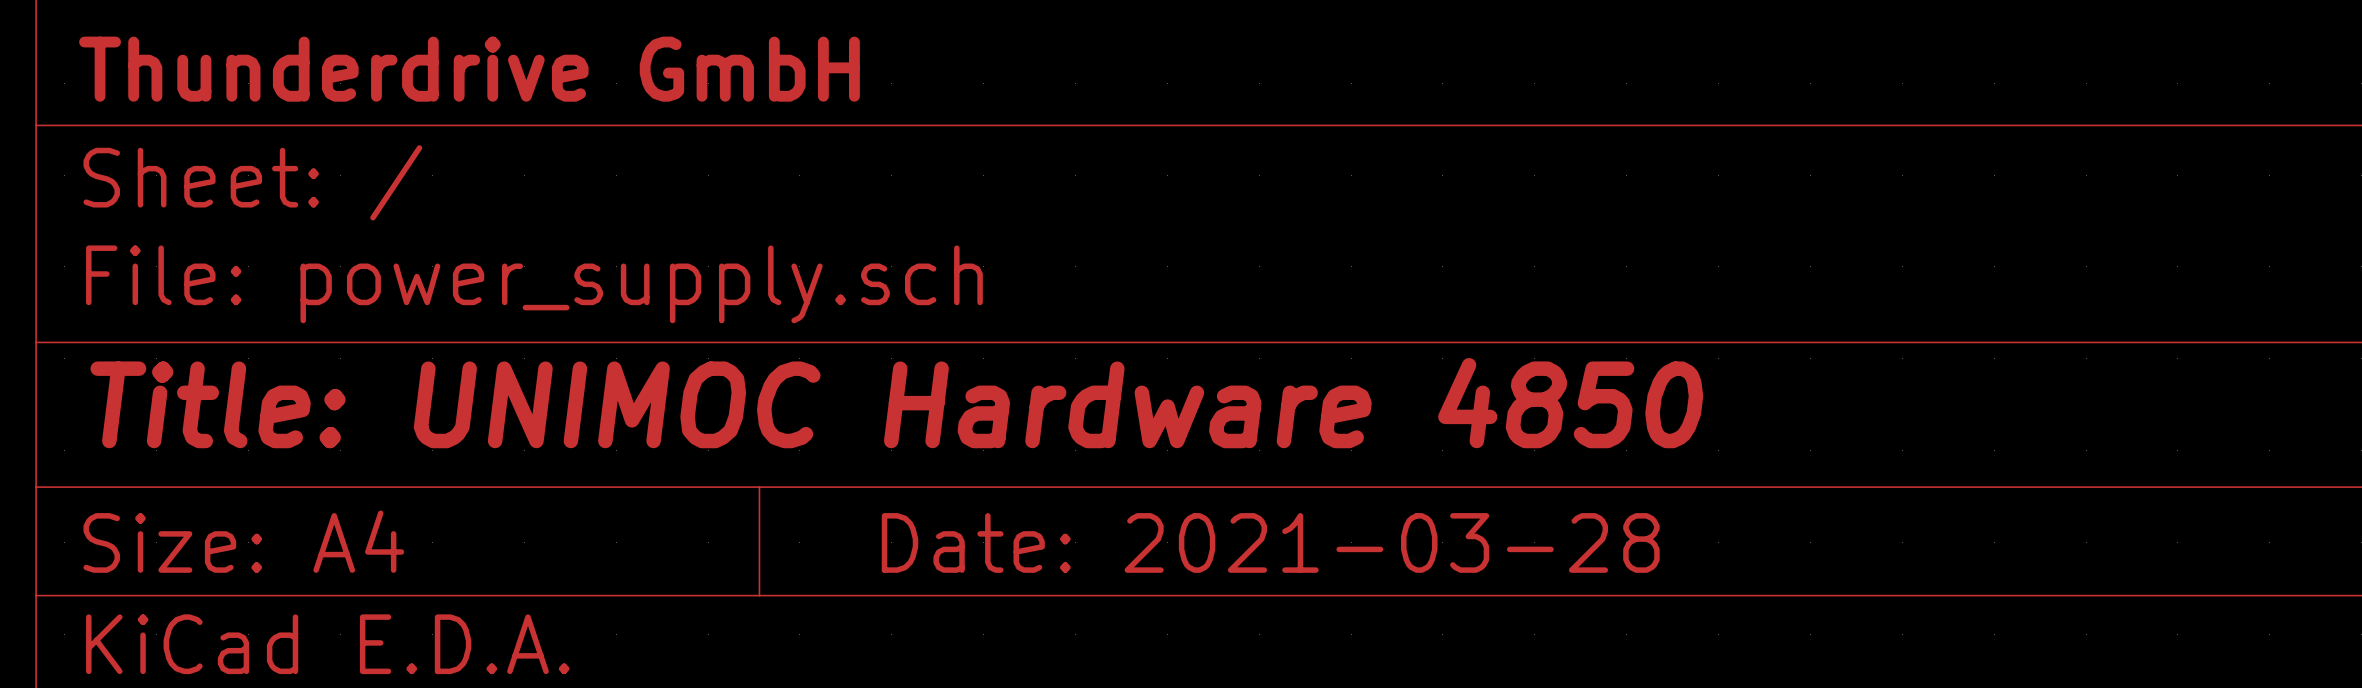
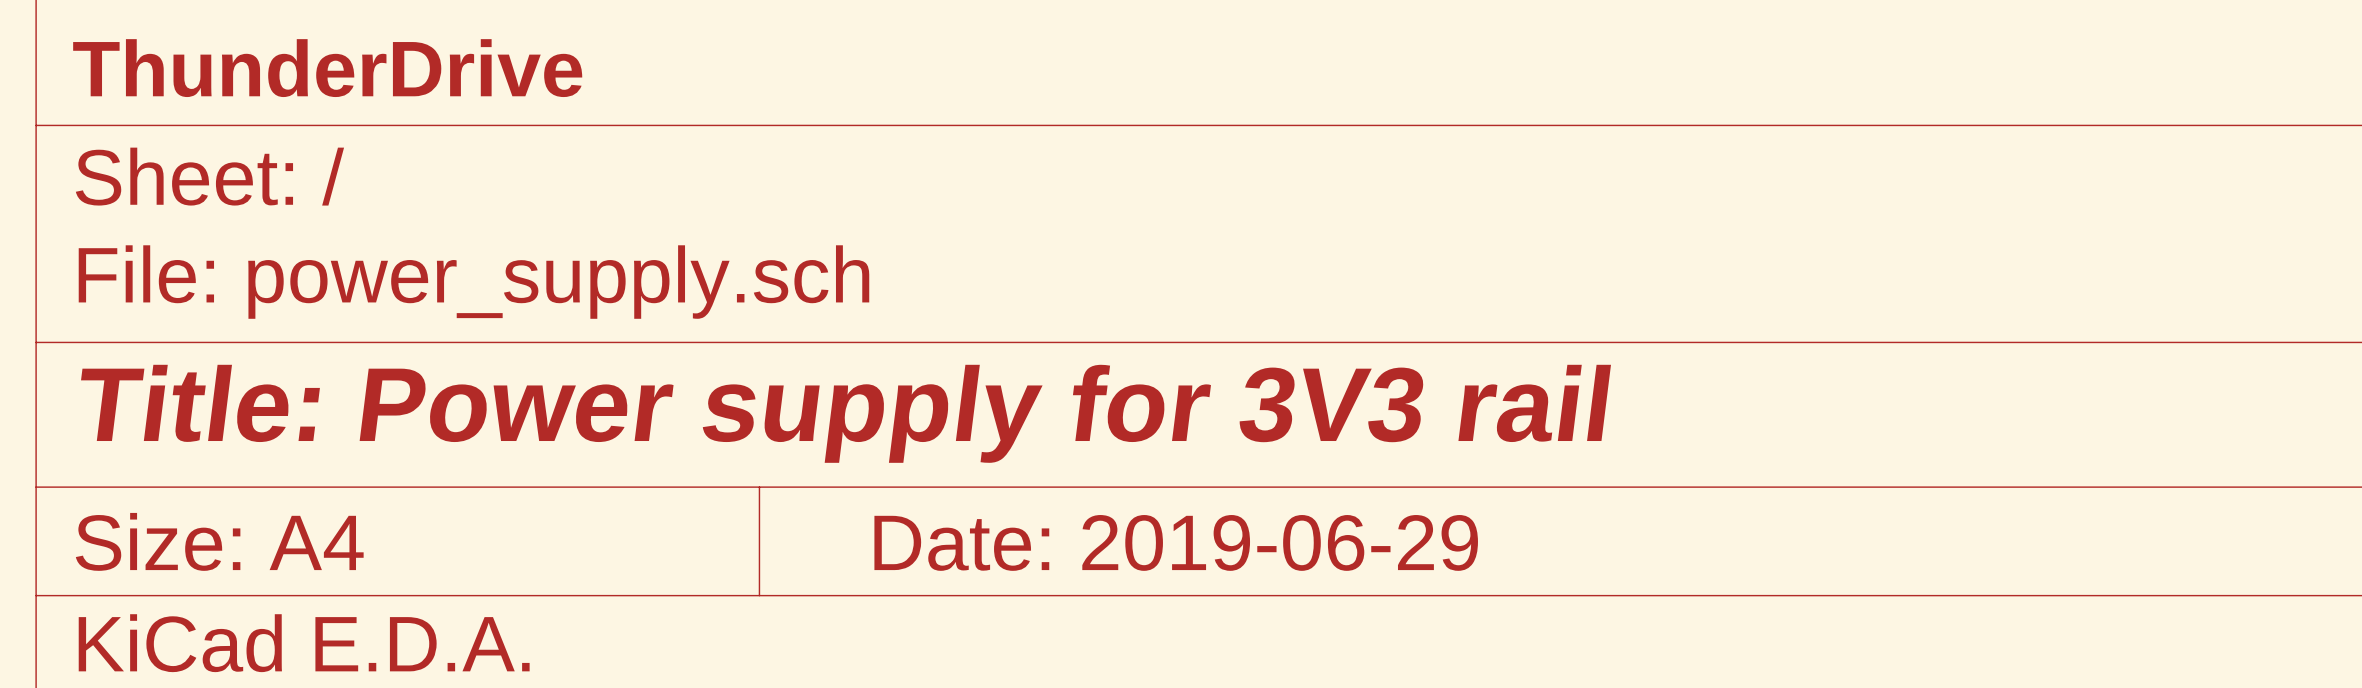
title block: Thunderdrive GmbH (469, 69) -> ThunderDrive (327, 68)
title block: Title: UNIMOC Hardware 4850 (896, 403) -> Title: Power supply for 3V3 rail (846, 413)
title block: Date: 2021-03-28 (1270, 542) -> Date: 2019-06-29 (1176, 542)

